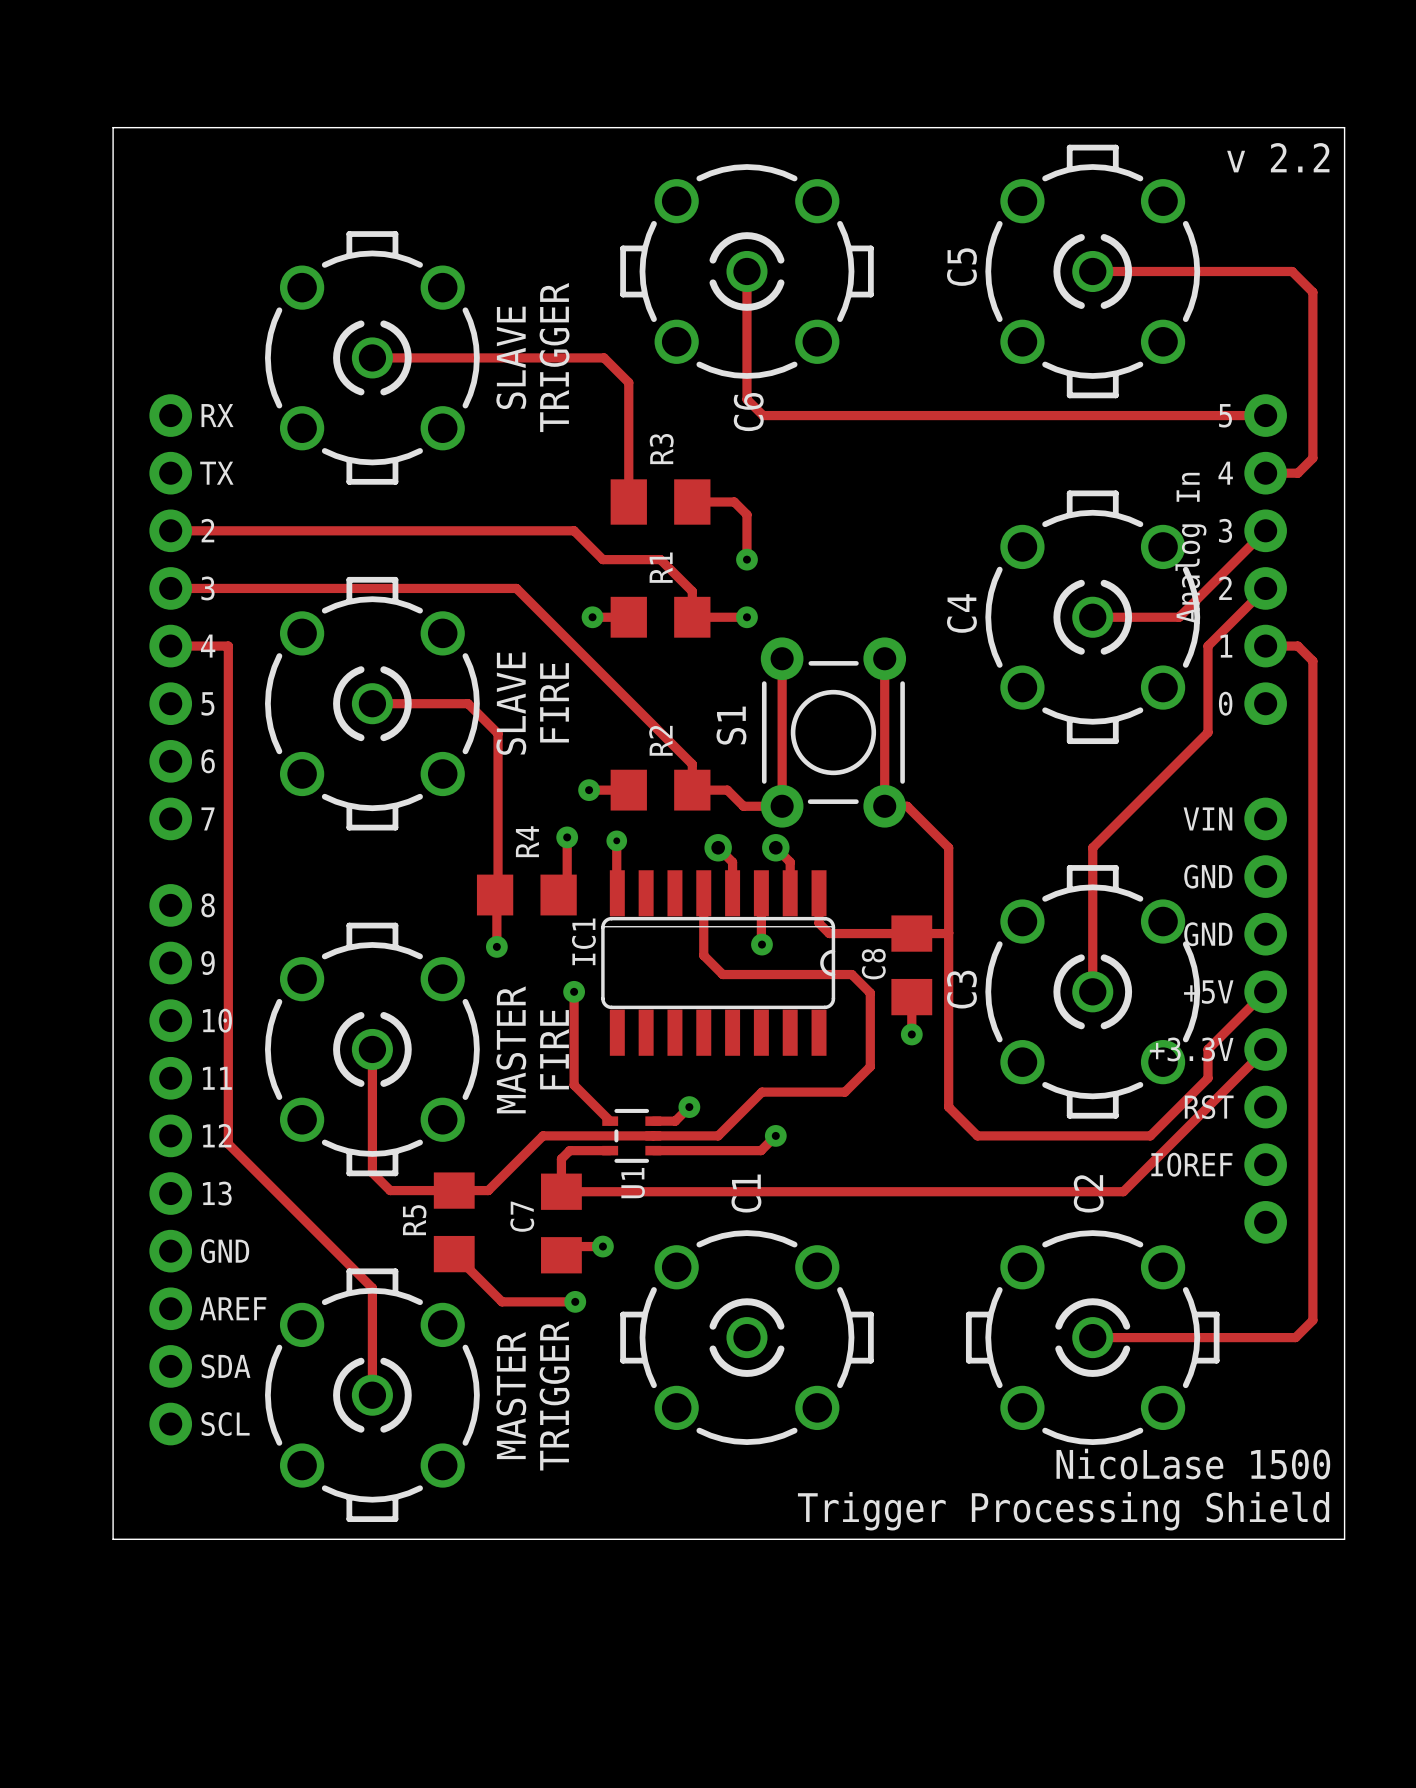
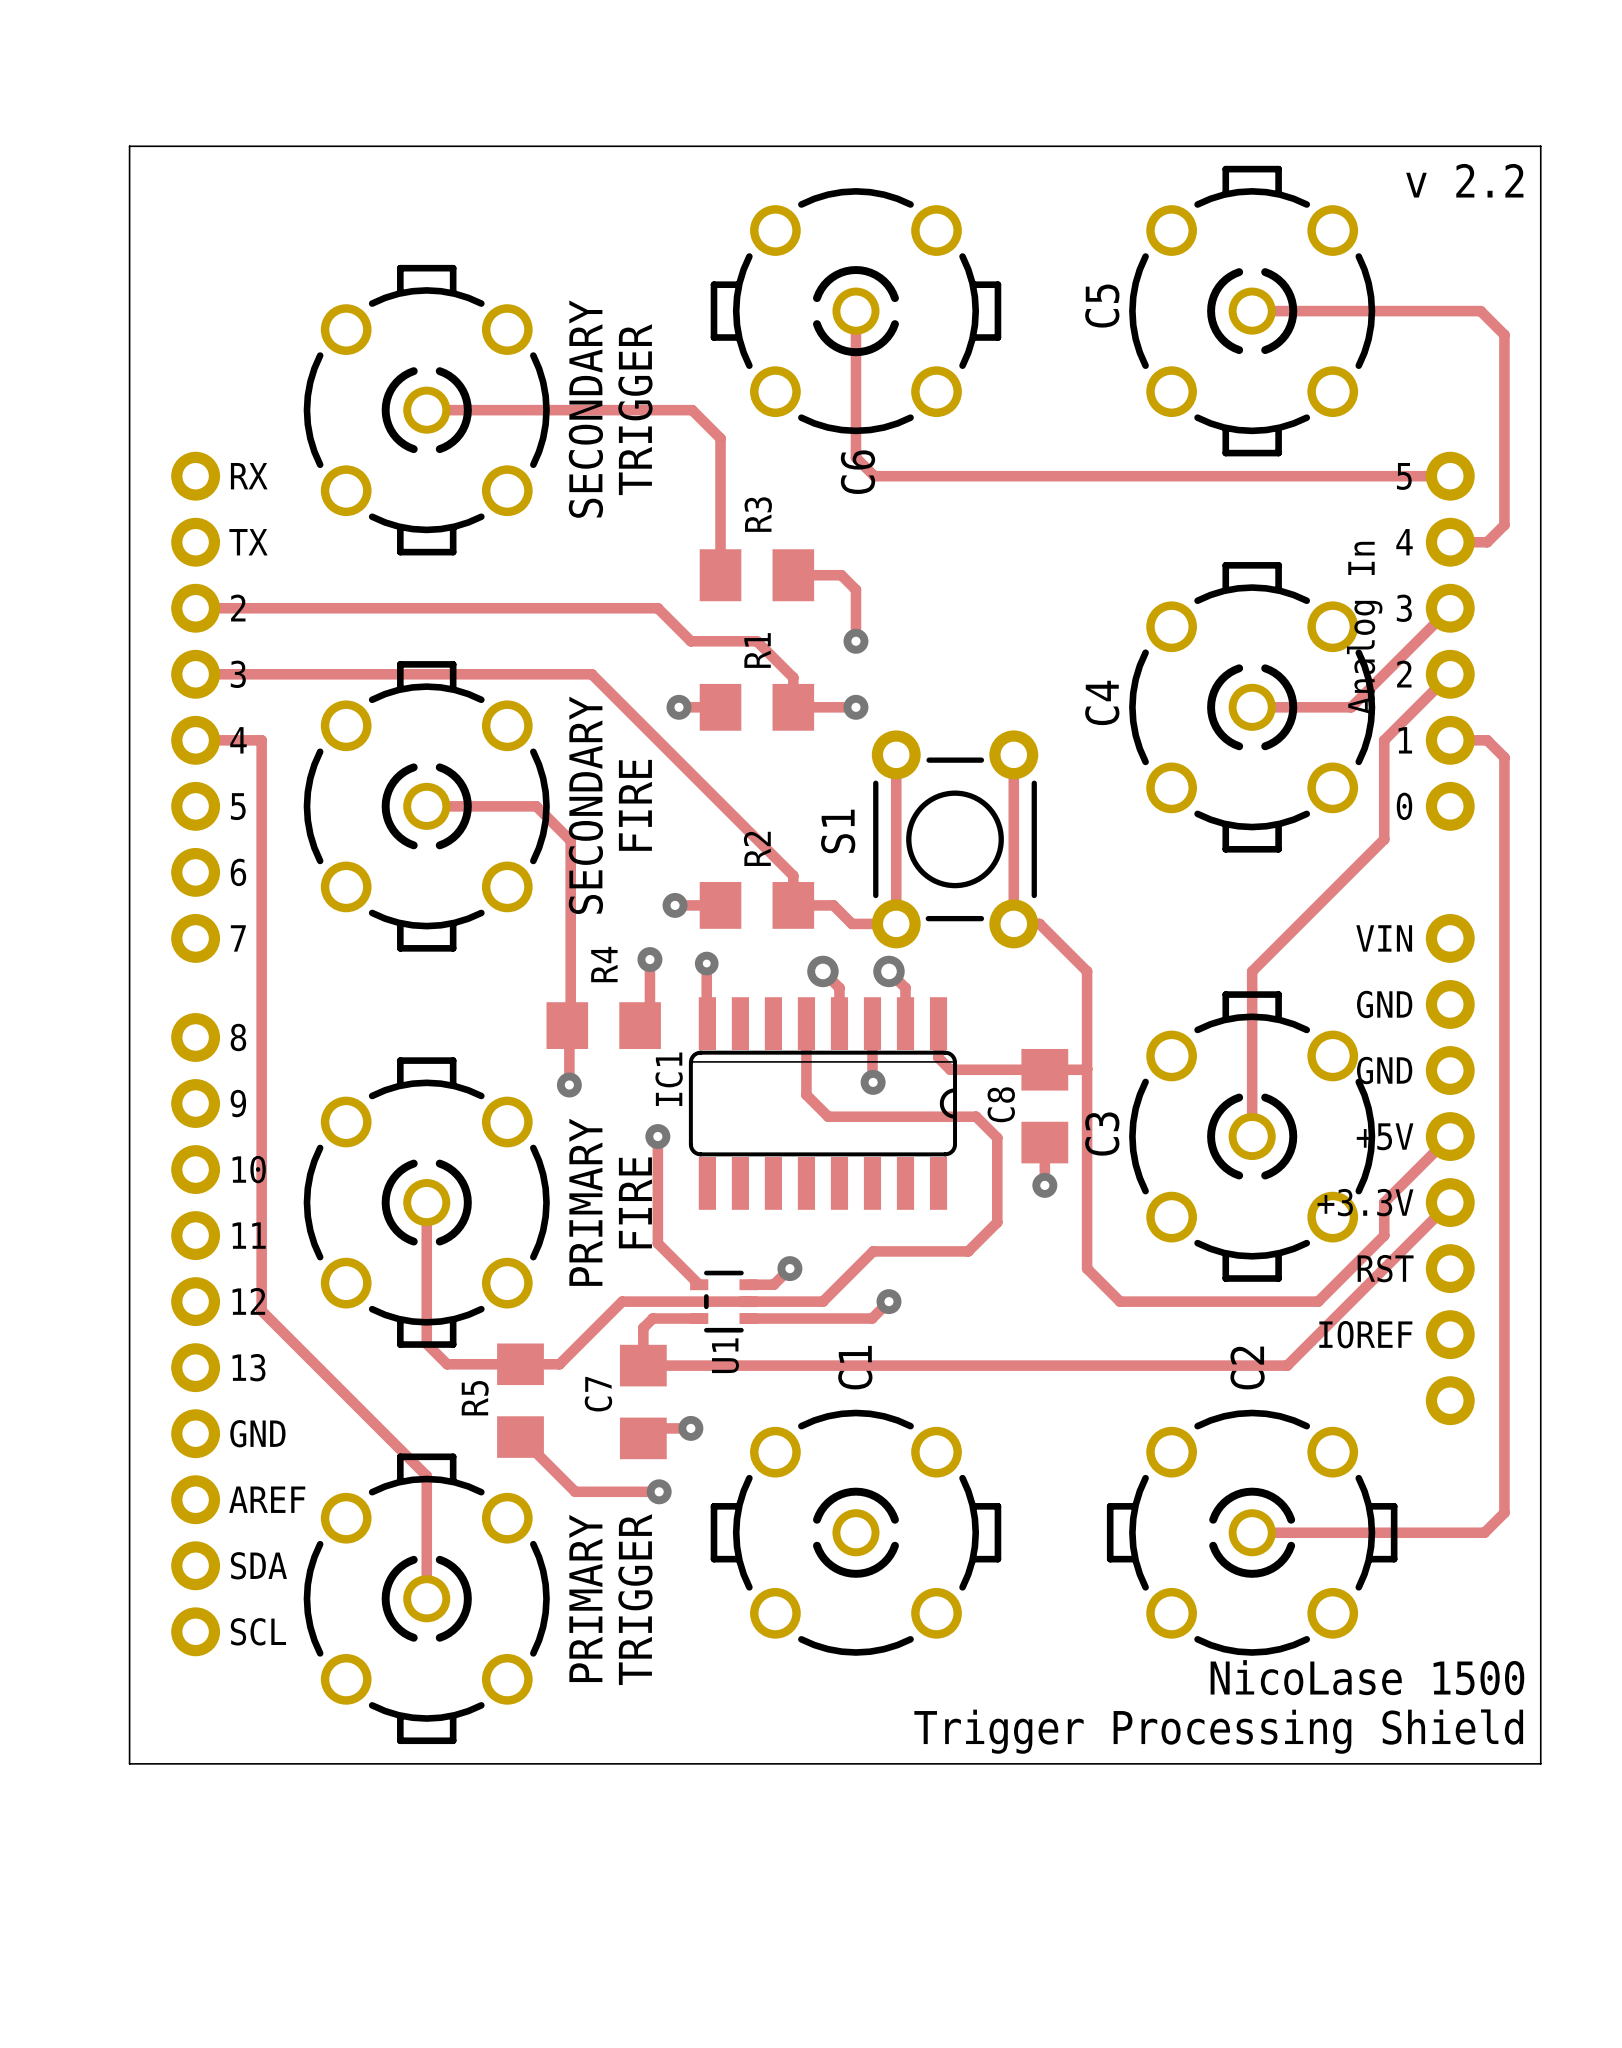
text: SLAVE (511, 357) -> SECONDARY (585, 409)
text: SLAVE (511, 703) -> SECONDARY (585, 805)
text: MASTER (511, 1049) -> PRIMARY (585, 1202)
text: MASTER (511, 1395) -> PRIMARY (585, 1598)

